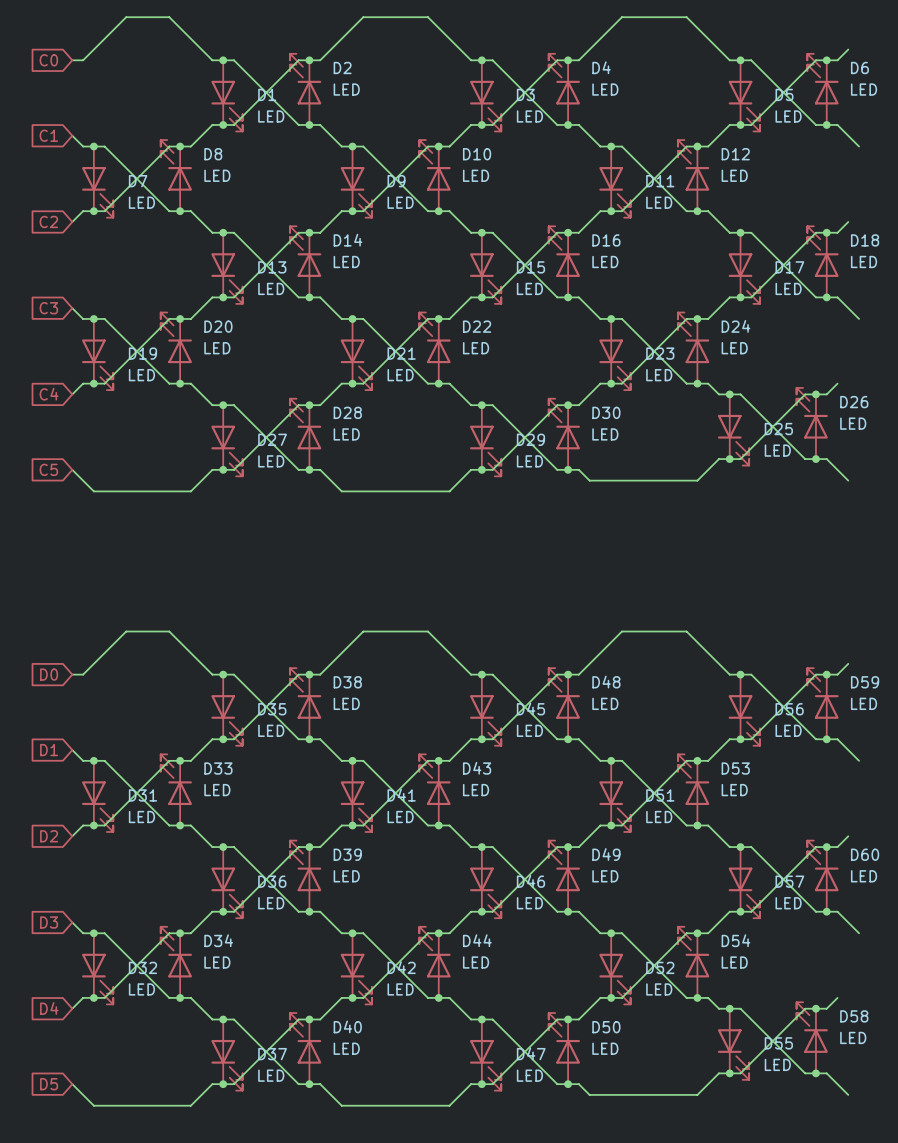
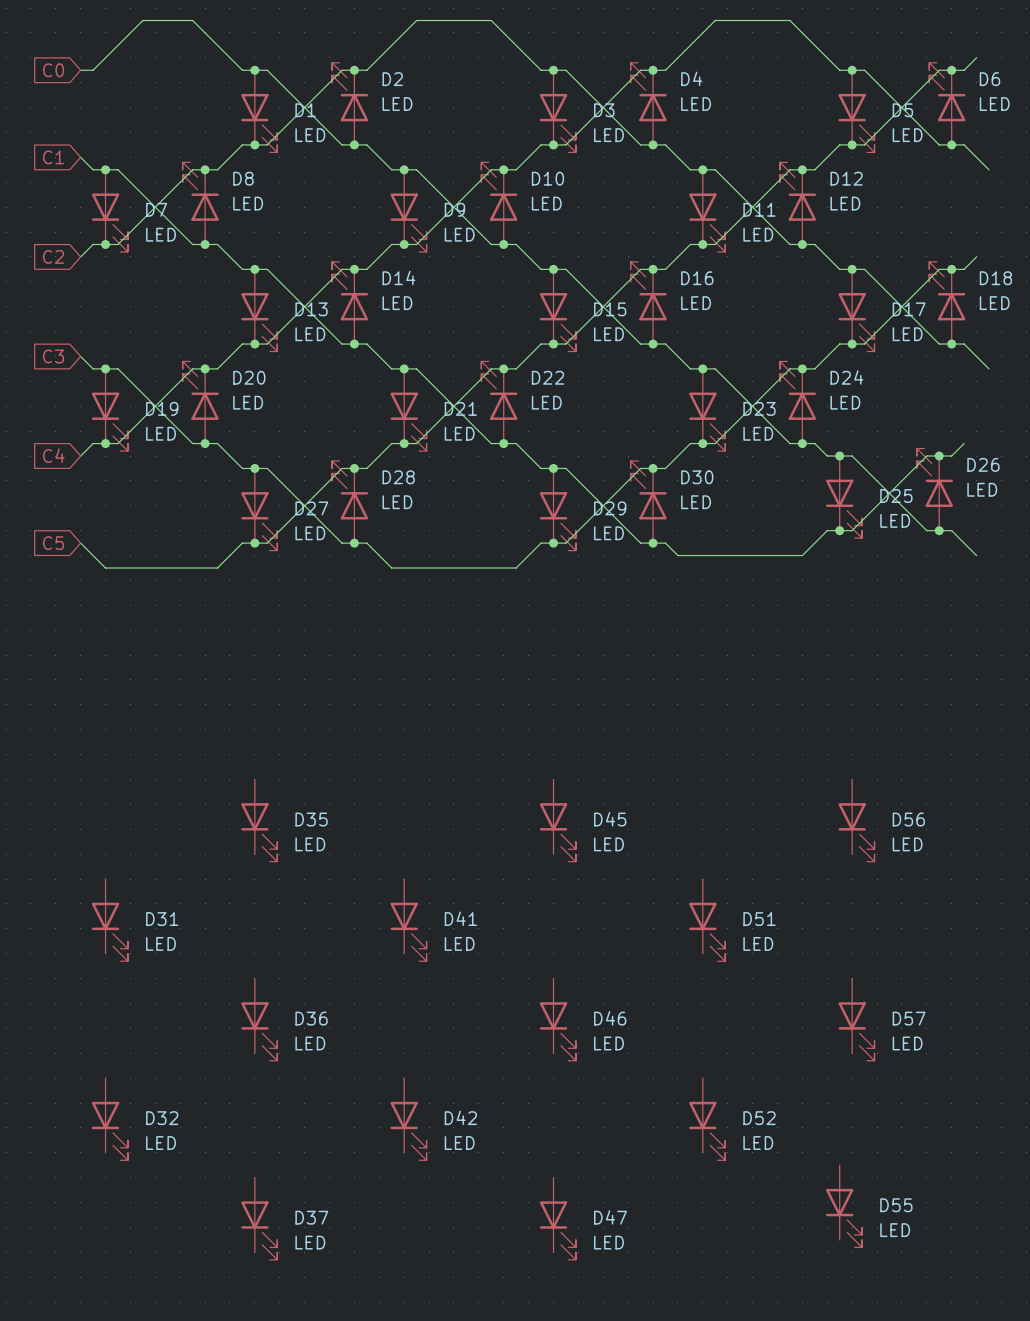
wire: (848, 663) (837, 674) (815, 674) (751, 739) (729, 739) (708, 760) (686, 760) (621, 825) (600, 825) (578, 847) (557, 847) (492, 911) (471, 911) (449, 933) (427, 933) (363, 997) (341, 997) (320, 1019) (298, 1019) (233, 1084) (212, 1084) (190, 1105) (93, 1105) (72, 1084) -> none
global label: D0 (49, 674) -> none
wire: (72, 674) (83, 674) (126, 631) (169, 631) (212, 674) (233, 674) (298, 739) (320, 739) (341, 760) (363, 760) (427, 825) (449, 825) (471, 847) (492, 847) (557, 911) (578, 911) (600, 933) (621, 933) (686, 997) (708, 997) (718, 1008) (740, 1008) (805, 1073) (826, 1073) (848, 1094) -> none
junction: (223, 674) -> none
junction: (309, 674) -> none
junction: (481, 674) -> none
junction: (568, 674) -> none
junction: (740, 674) -> none
junction: (826, 674) -> none
D38: LED (305, 703) -> none
D48: LED (564, 703) -> none
D59: LED (822, 703) -> none
junction: (223, 739) -> none
junction: (309, 739) -> none
junction: (481, 739) -> none
junction: (568, 739) -> none
junction: (740, 739) -> none
junction: (826, 739) -> none
global label: D1 (49, 750) -> none
wire: (72, 750) (83, 760) (104, 760) (169, 825) (190, 825) (212, 847) (233, 847) (298, 911) (320, 911) (341, 933) (363, 933) (427, 997) (449, 997) (471, 1019) (492, 1019) (557, 1084) (578, 1084) (589, 1094) (697, 1094) (718, 1073) (740, 1073) (805, 1008) (826, 1008) (837, 997) -> none
junction: (93, 760) -> none
junction: (180, 760) -> none
junction: (352, 760) -> none
junction: (438, 760) -> none
junction: (611, 760) -> none
junction: (697, 760) -> none
wire: (859, 760) (837, 739) (815, 739) (751, 674) (729, 674) (686, 631) (621, 631) (578, 674) (557, 674) (492, 739) (471, 739) (449, 760) (427, 760) (363, 825) (341, 825) (320, 847) (298, 847) (233, 911) (212, 911) (190, 933) (169, 933) (104, 997) (83, 997) (72, 1008) -> none
D33: LED (176, 789) -> none
D43: LED (434, 789) -> none
D53: LED (693, 789) -> none
junction: (93, 825) -> none
junction: (180, 825) -> none
junction: (352, 825) -> none
junction: (438, 825) -> none
junction: (611, 825) -> none
junction: (697, 825) -> none
global label: D2 (49, 836) -> none
wire: (72, 836) (83, 825) (104, 825) (169, 760) (190, 760) (212, 739) (233, 739) (298, 674) (320, 674) (363, 631) (427, 631) (471, 674) (492, 674) (557, 739) (578, 739) (600, 760) (621, 760) (686, 825) (708, 825) (729, 847) (751, 847) (815, 911) (837, 911) (859, 933) -> none
wire: (848, 836) (837, 847) (815, 847) (751, 911) (729, 911) (708, 933) (686, 933) (621, 997) (600, 997) (578, 1019) (557, 1019) (492, 1084) (471, 1084) (449, 1105) (341, 1105) (320, 1084) (298, 1084) (233, 1019) (212, 1019) (190, 997) (169, 997) (104, 933) (83, 933) (72, 922) -> none
junction: (223, 847) -> none
junction: (309, 847) -> none
junction: (481, 847) -> none
junction: (568, 847) -> none
junction: (740, 847) -> none
junction: (826, 847) -> none
D39: LED (305, 876) -> none
D49: LED (564, 876) -> none
D60: LED (822, 876) -> none
junction: (223, 911) -> none
junction: (309, 911) -> none
junction: (481, 911) -> none
junction: (568, 911) -> none
junction: (740, 911) -> none
junction: (826, 911) -> none
global label: D3 (49, 922) -> none
junction: (93, 933) -> none
junction: (180, 933) -> none
junction: (352, 933) -> none
junction: (438, 933) -> none
junction: (611, 933) -> none
junction: (697, 933) -> none
D34: LED (176, 962) -> none
D44: LED (434, 962) -> none
D54: LED (693, 962) -> none
junction: (93, 997) -> none
junction: (180, 997) -> none
junction: (352, 997) -> none
junction: (438, 997) -> none
junction: (611, 997) -> none
junction: (697, 997) -> none
global label: D4 (49, 1008) -> none
junction: (729, 1008) -> none
junction: (815, 1008) -> none
junction: (223, 1019) -> none
junction: (309, 1019) -> none
junction: (481, 1019) -> none
junction: (568, 1019) -> none
D58: LED (812, 1037) -> none
D40: LED (305, 1048) -> none
D50: LED (564, 1048) -> none
junction: (729, 1073) -> none
junction: (815, 1073) -> none
global label: D5 (49, 1084) -> none
junction: (223, 1084) -> none
junction: (309, 1084) -> none
junction: (481, 1084) -> none
junction: (568, 1084) -> none

